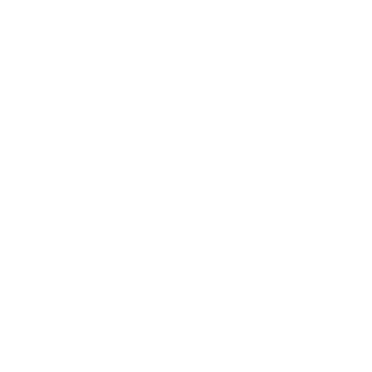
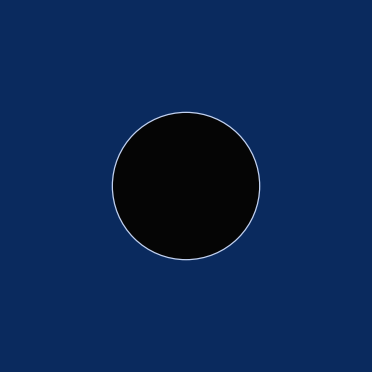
part: none -> (186, 186)

